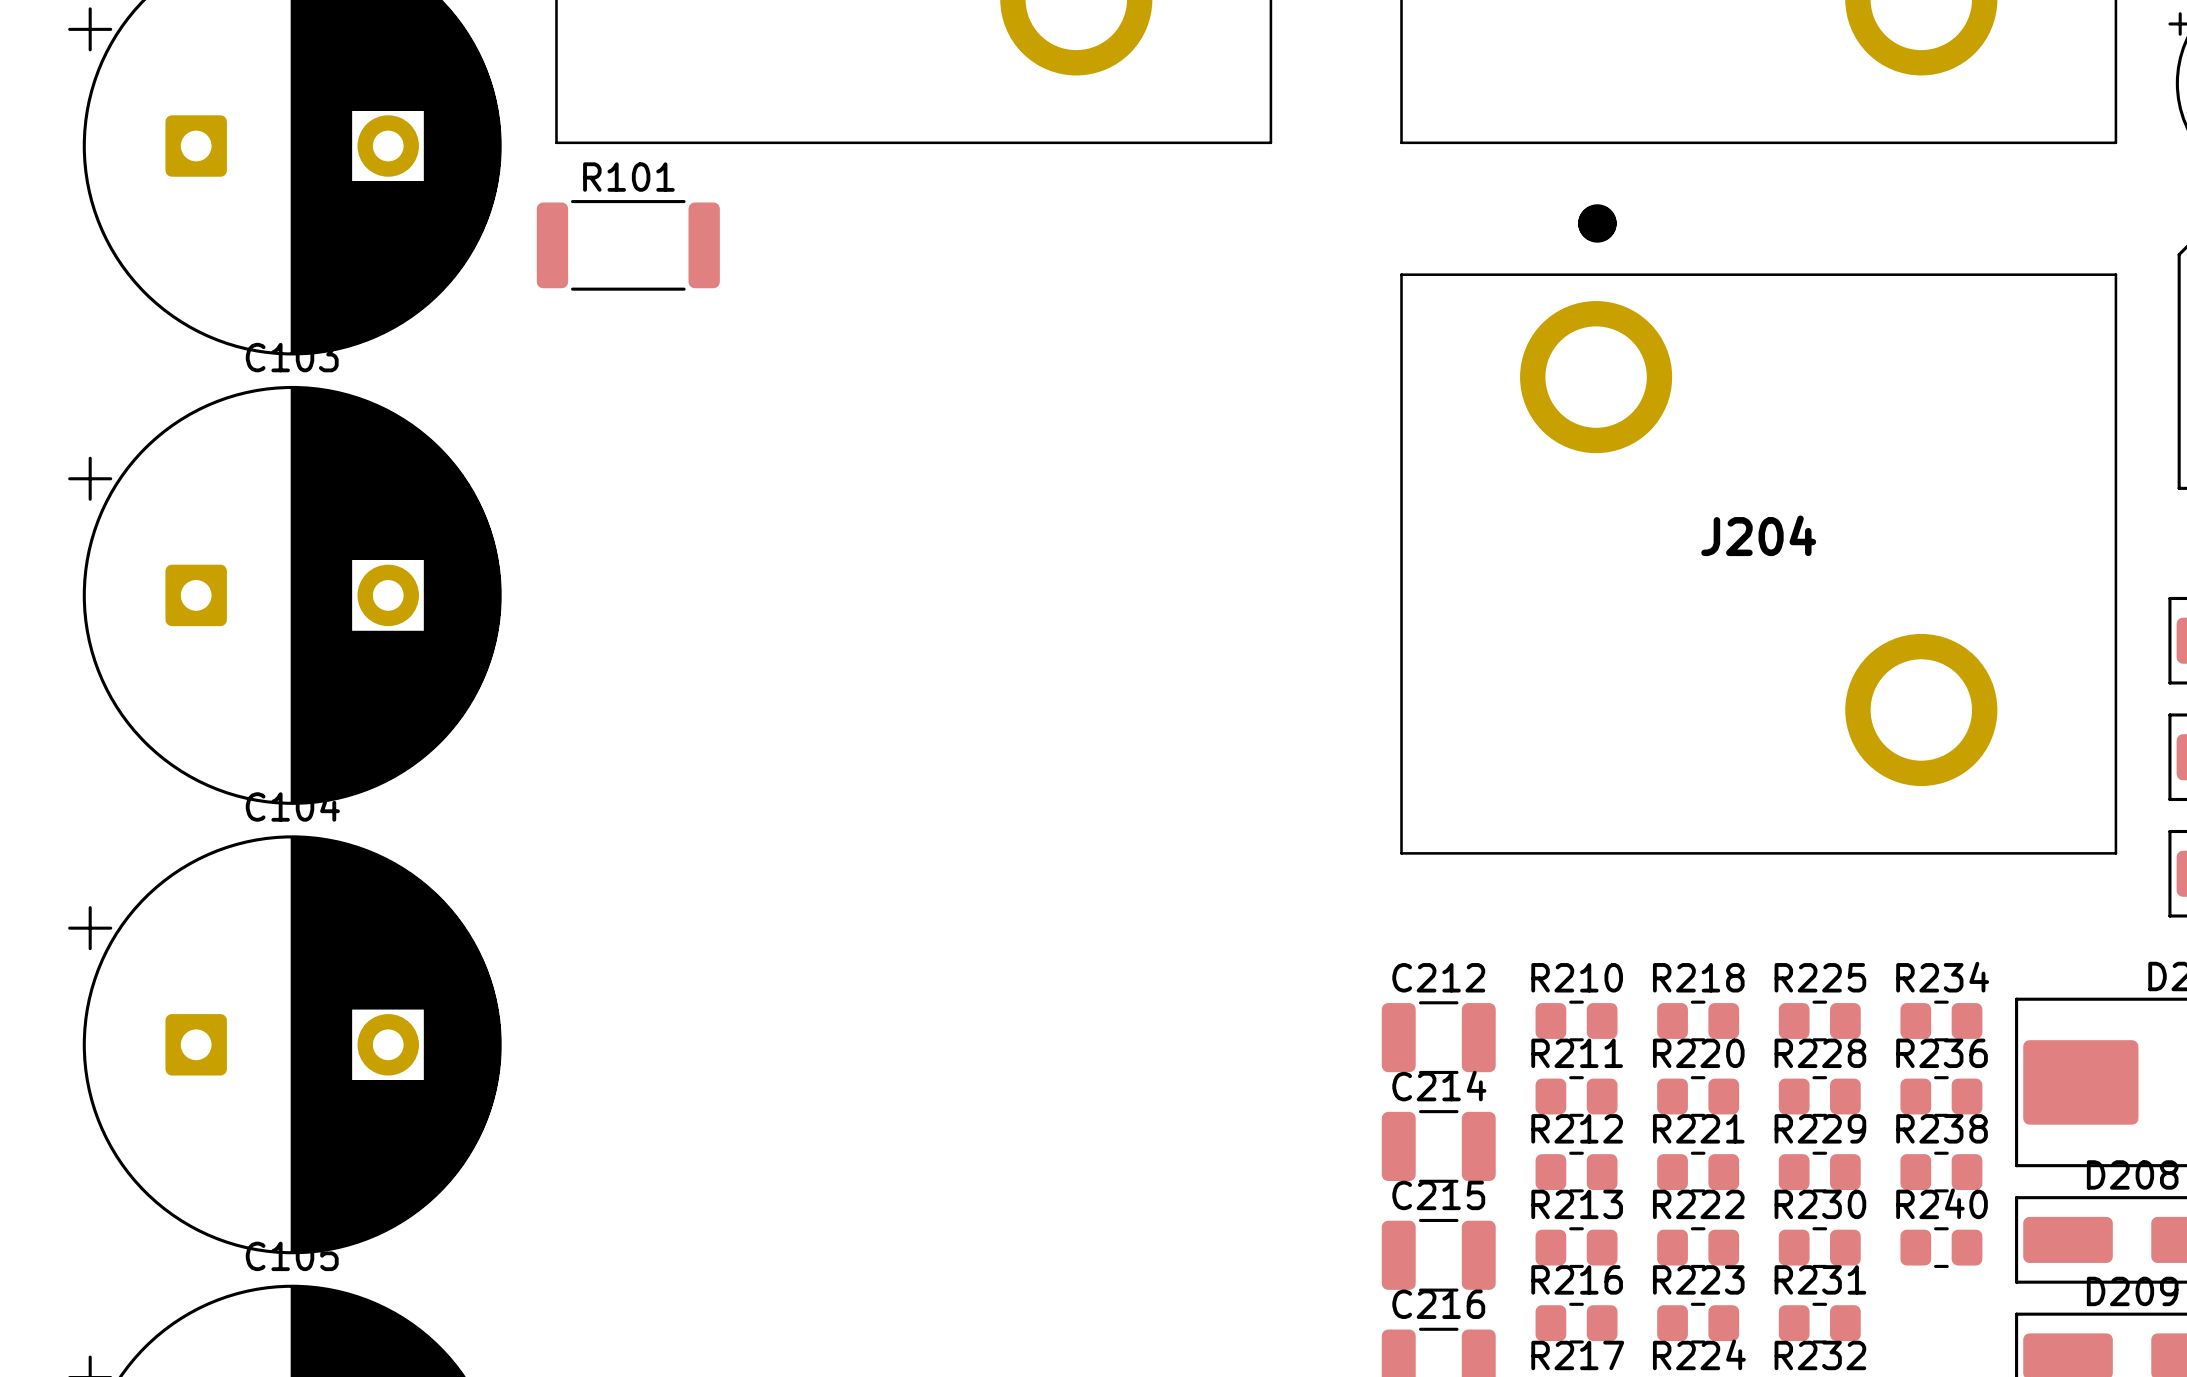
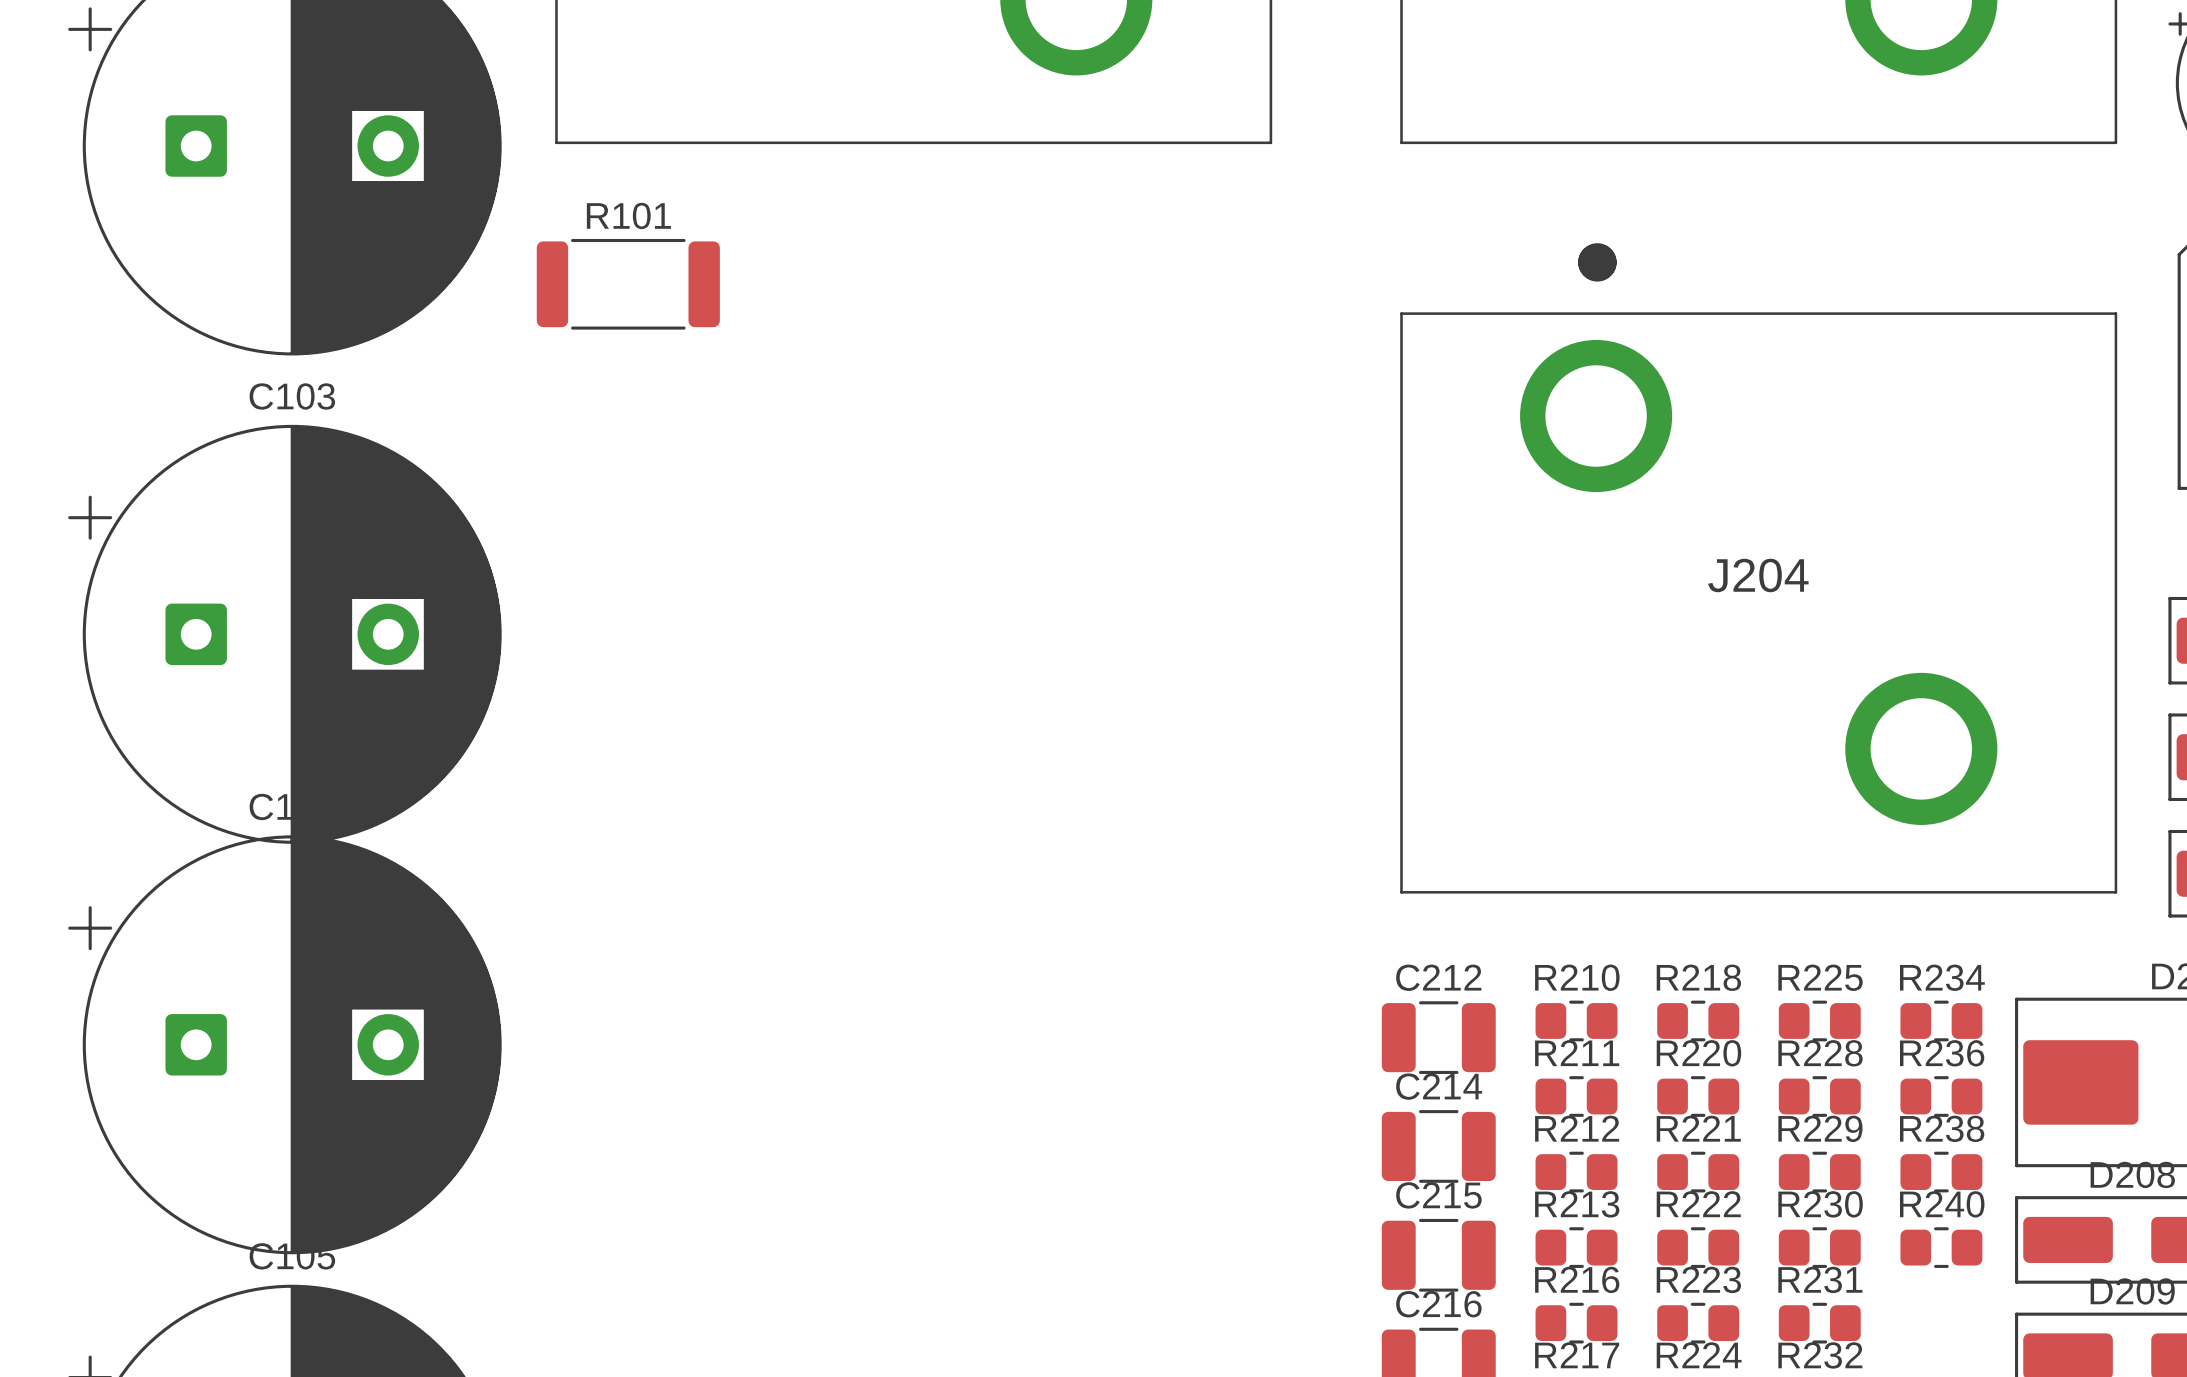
R101 position: (628, 245) -> (628, 284)
J204 position: (1758, 529) -> (1758, 568)
C103 position: (284, 595) -> (284, 634)

